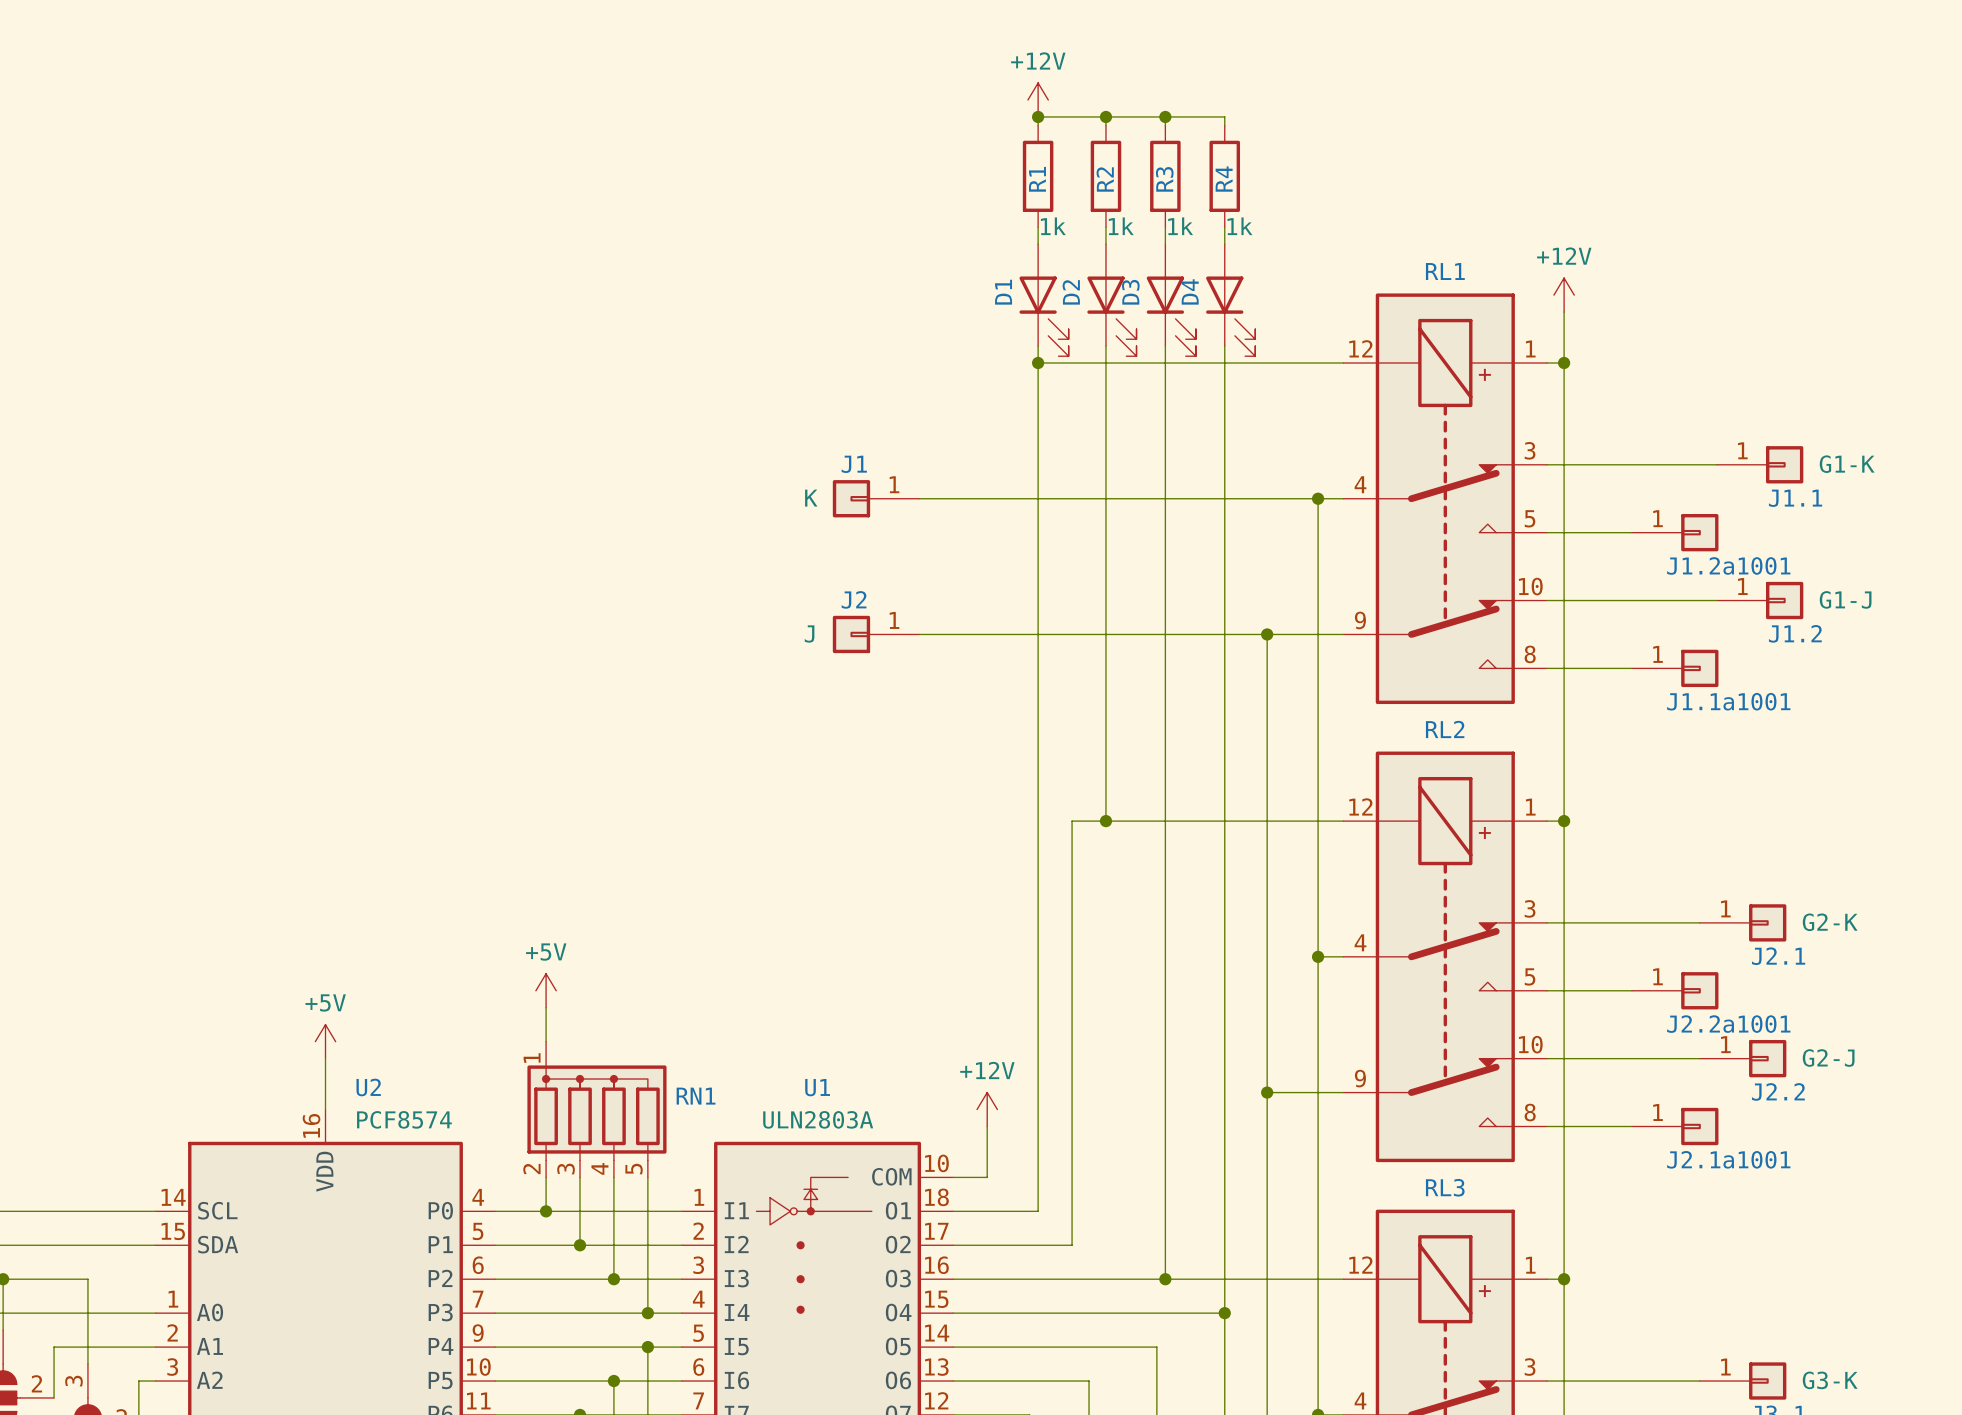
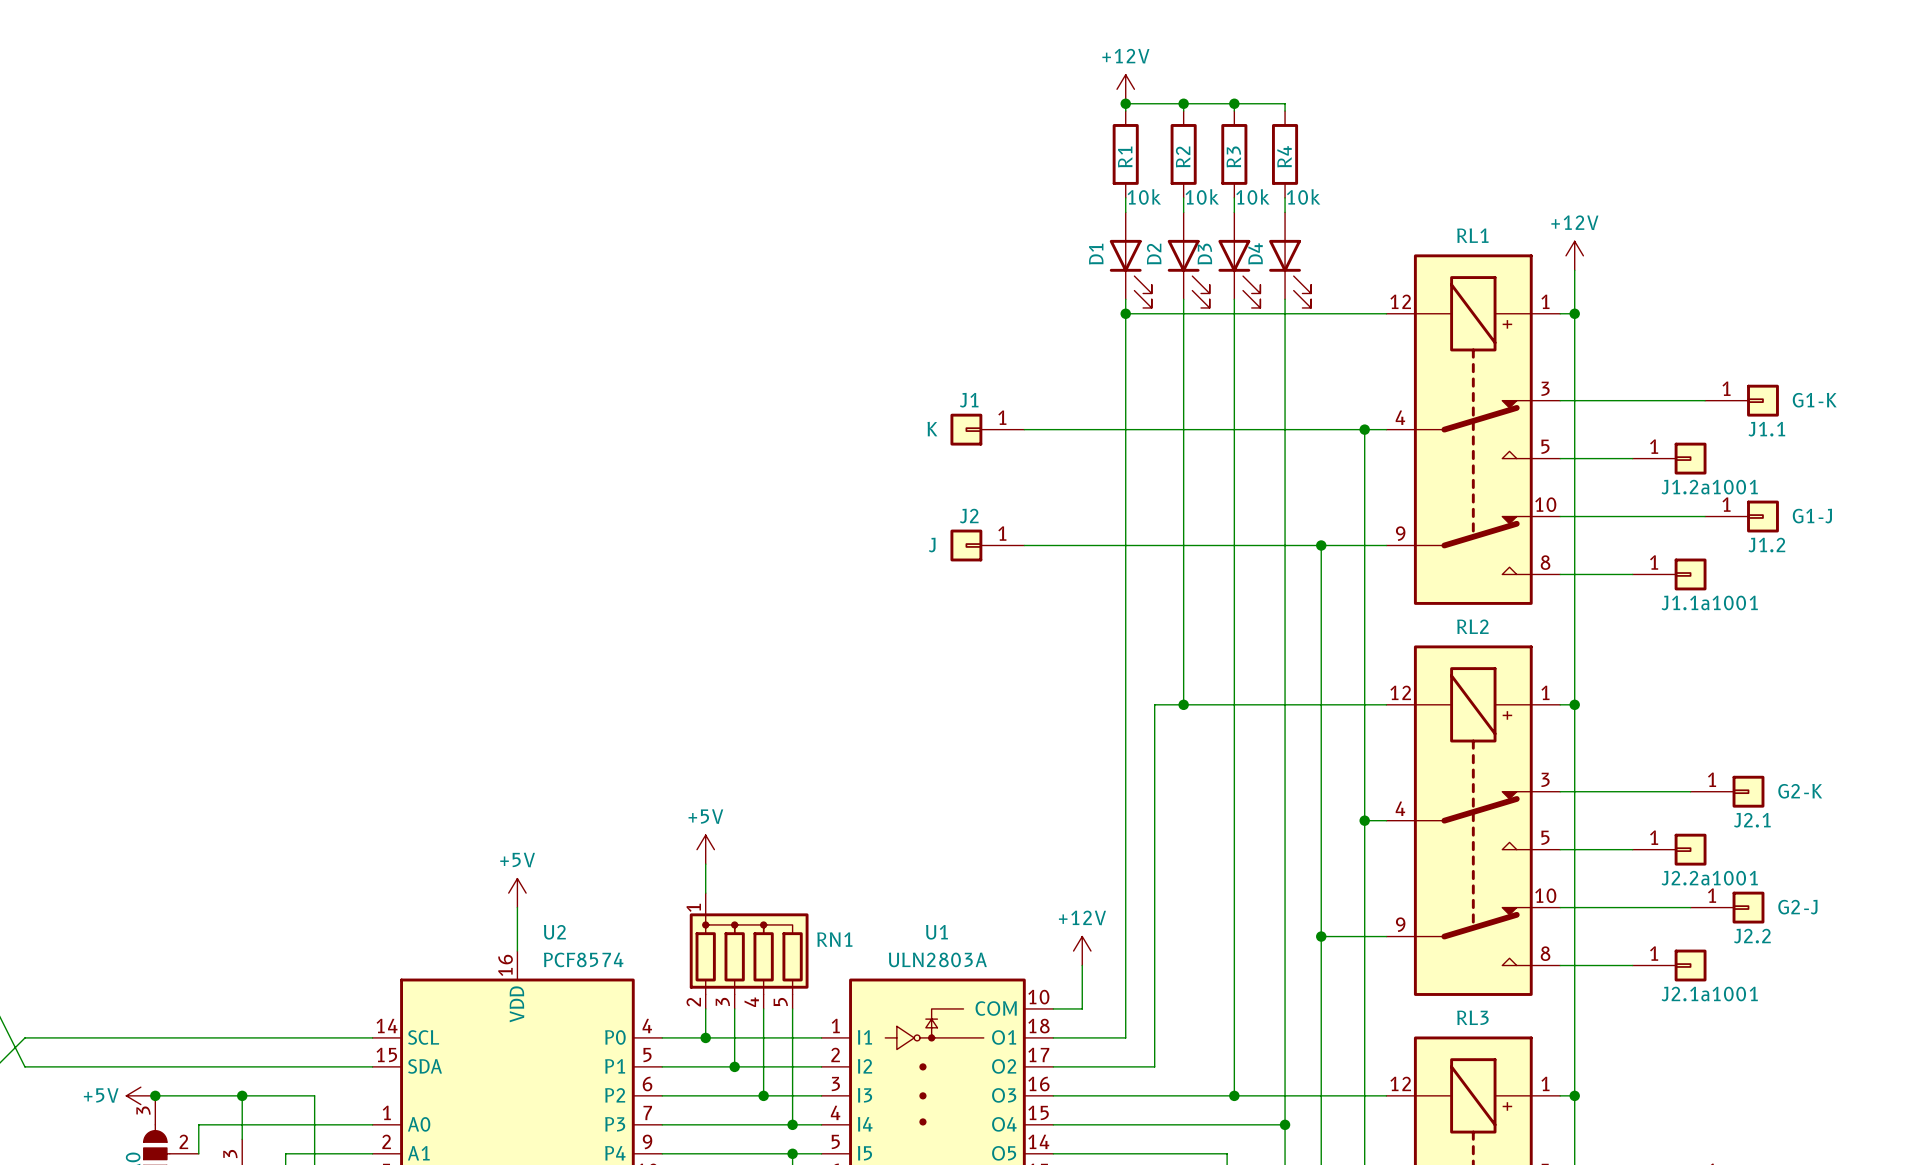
R1 value: 1k (1053, 226) -> 10k (1144, 196)
R2 value: 1k (1121, 226) -> 10k (1202, 196)
R3 value: 1k (1180, 226) -> 10k (1252, 196)
R4 value: 1k (1239, 226) -> 10k (1303, 196)

